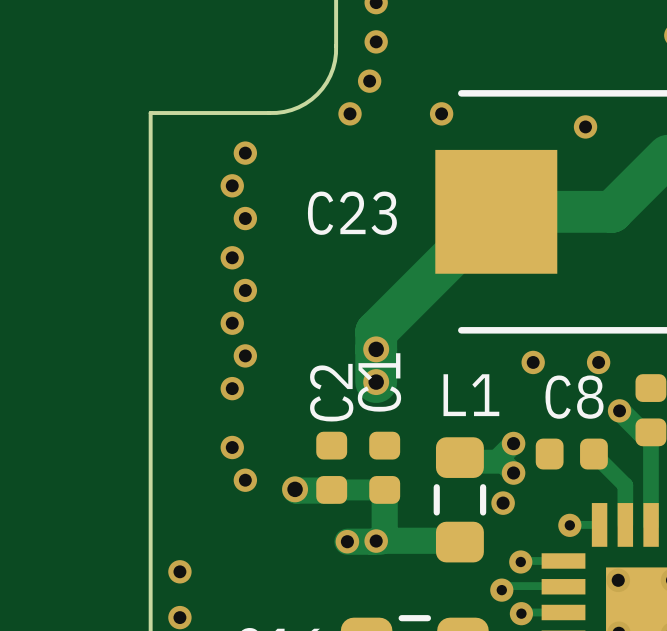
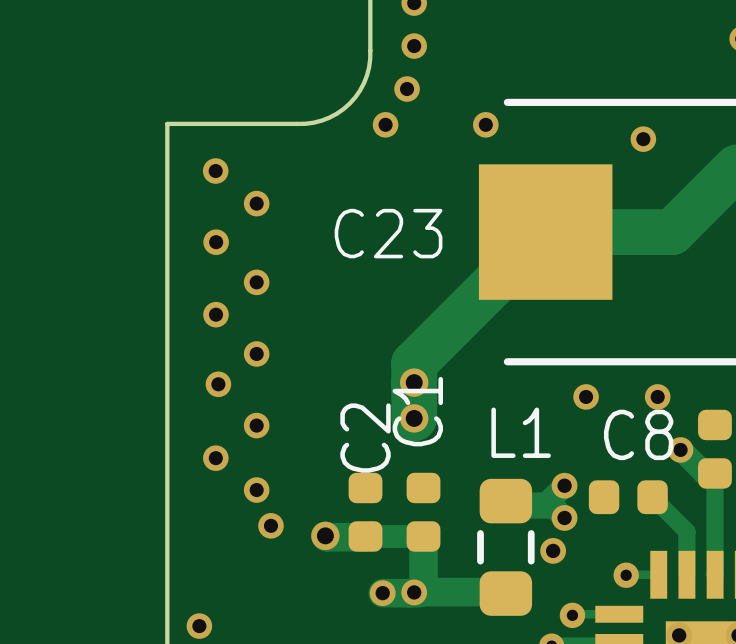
via: (245, 153) -> none
via: none -> (215, 171)
via: (245, 218) -> none
via: none -> (216, 242)
via: none -> (216, 314)
via: (245, 290) -> none
via: none -> (218, 384)
via: (245, 355) -> none
via: none -> (215, 458)

